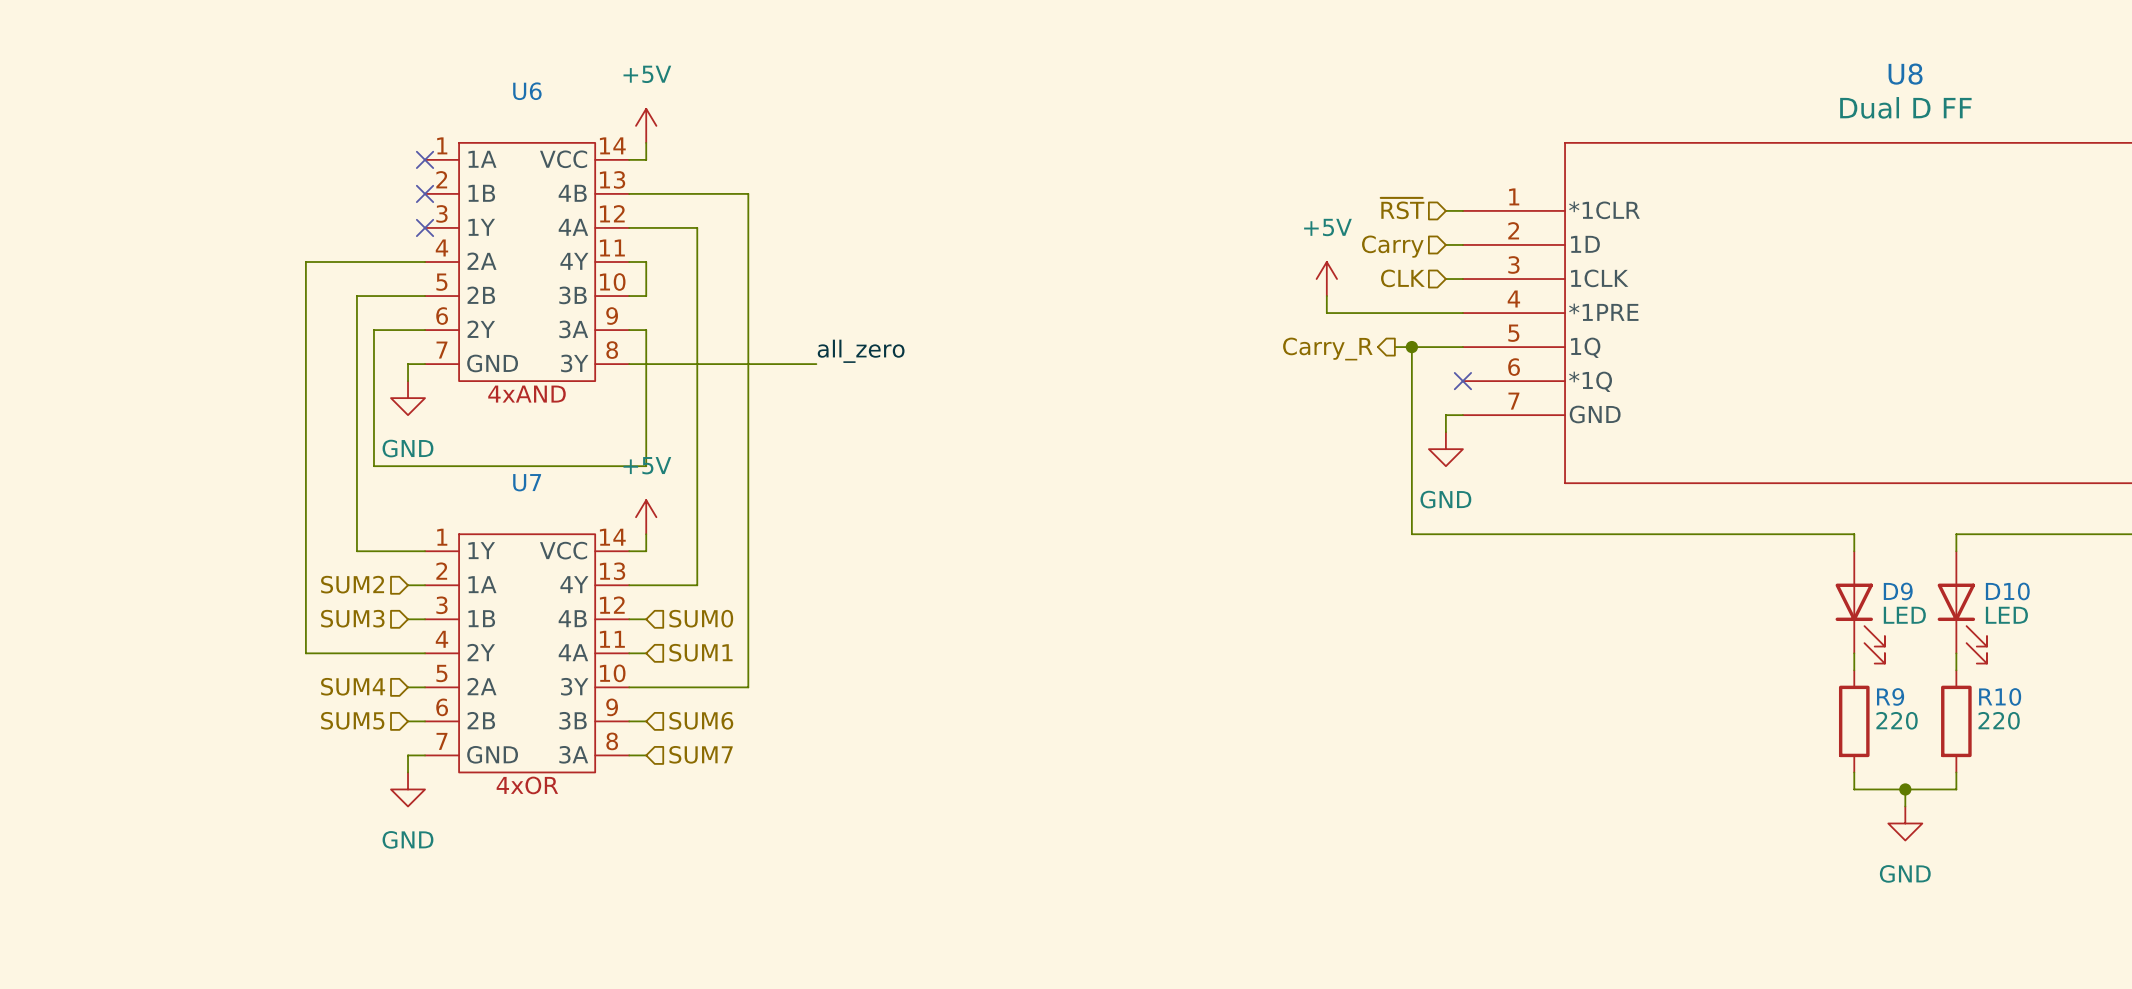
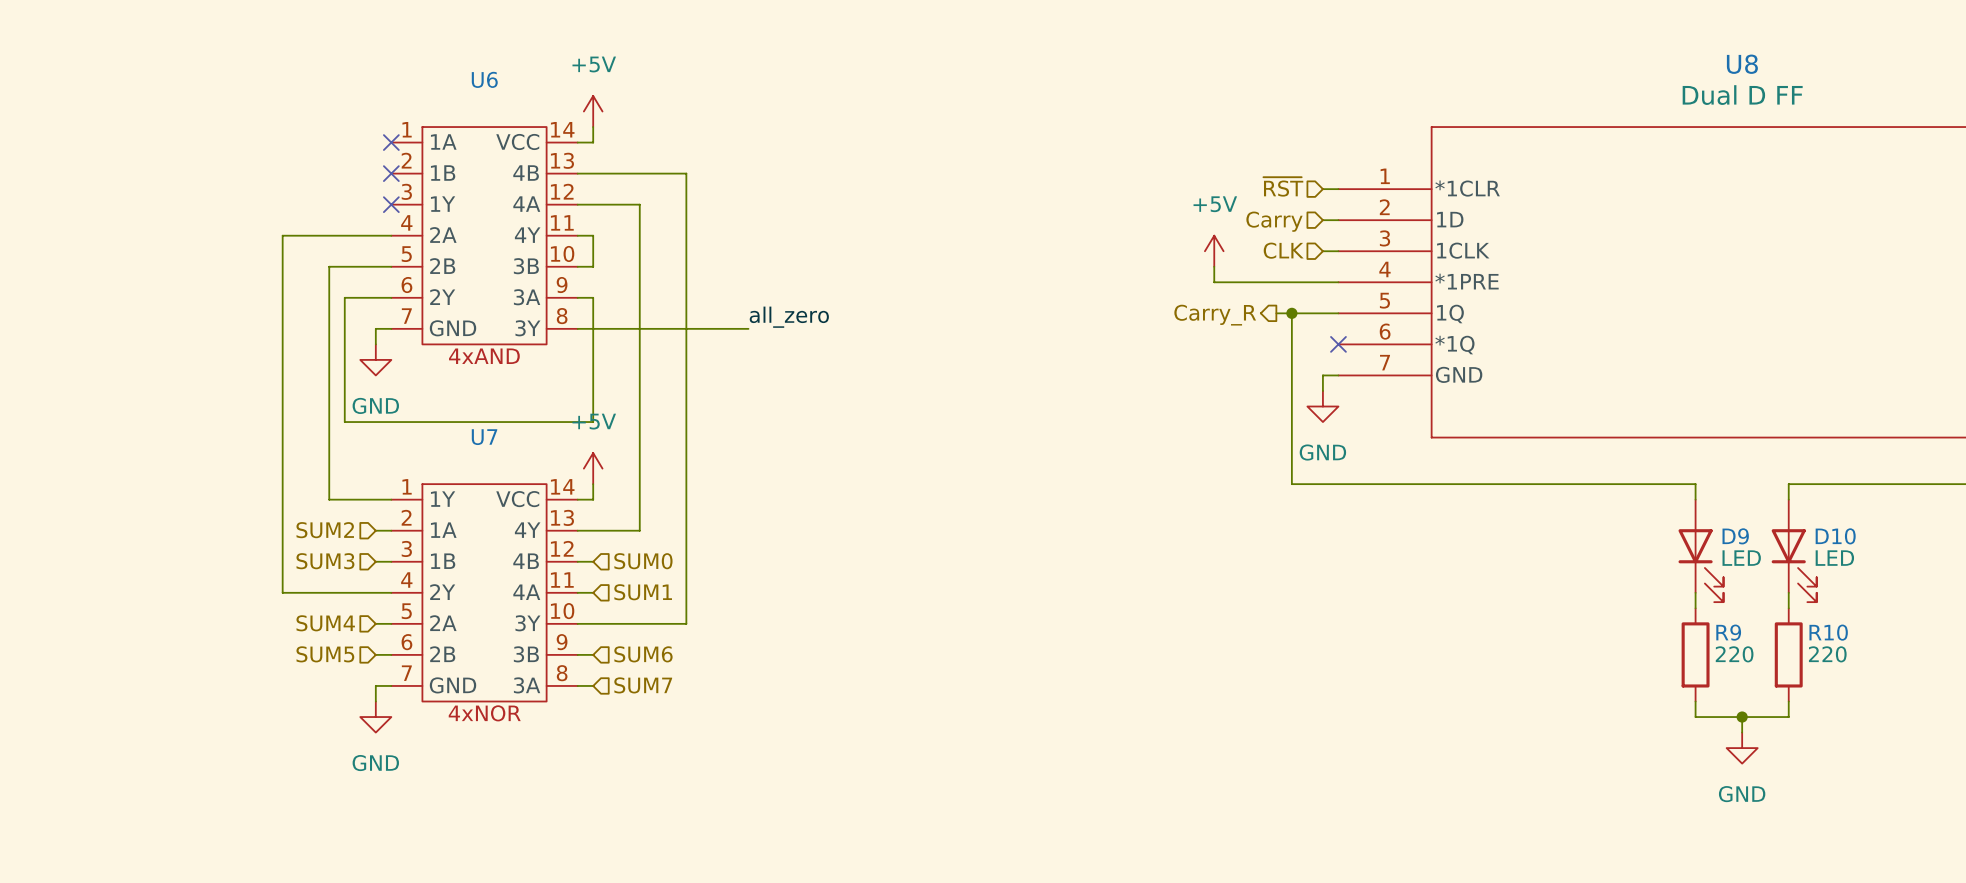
U7 text: 4xOR (527, 785) -> 4xNOR (484, 713)

